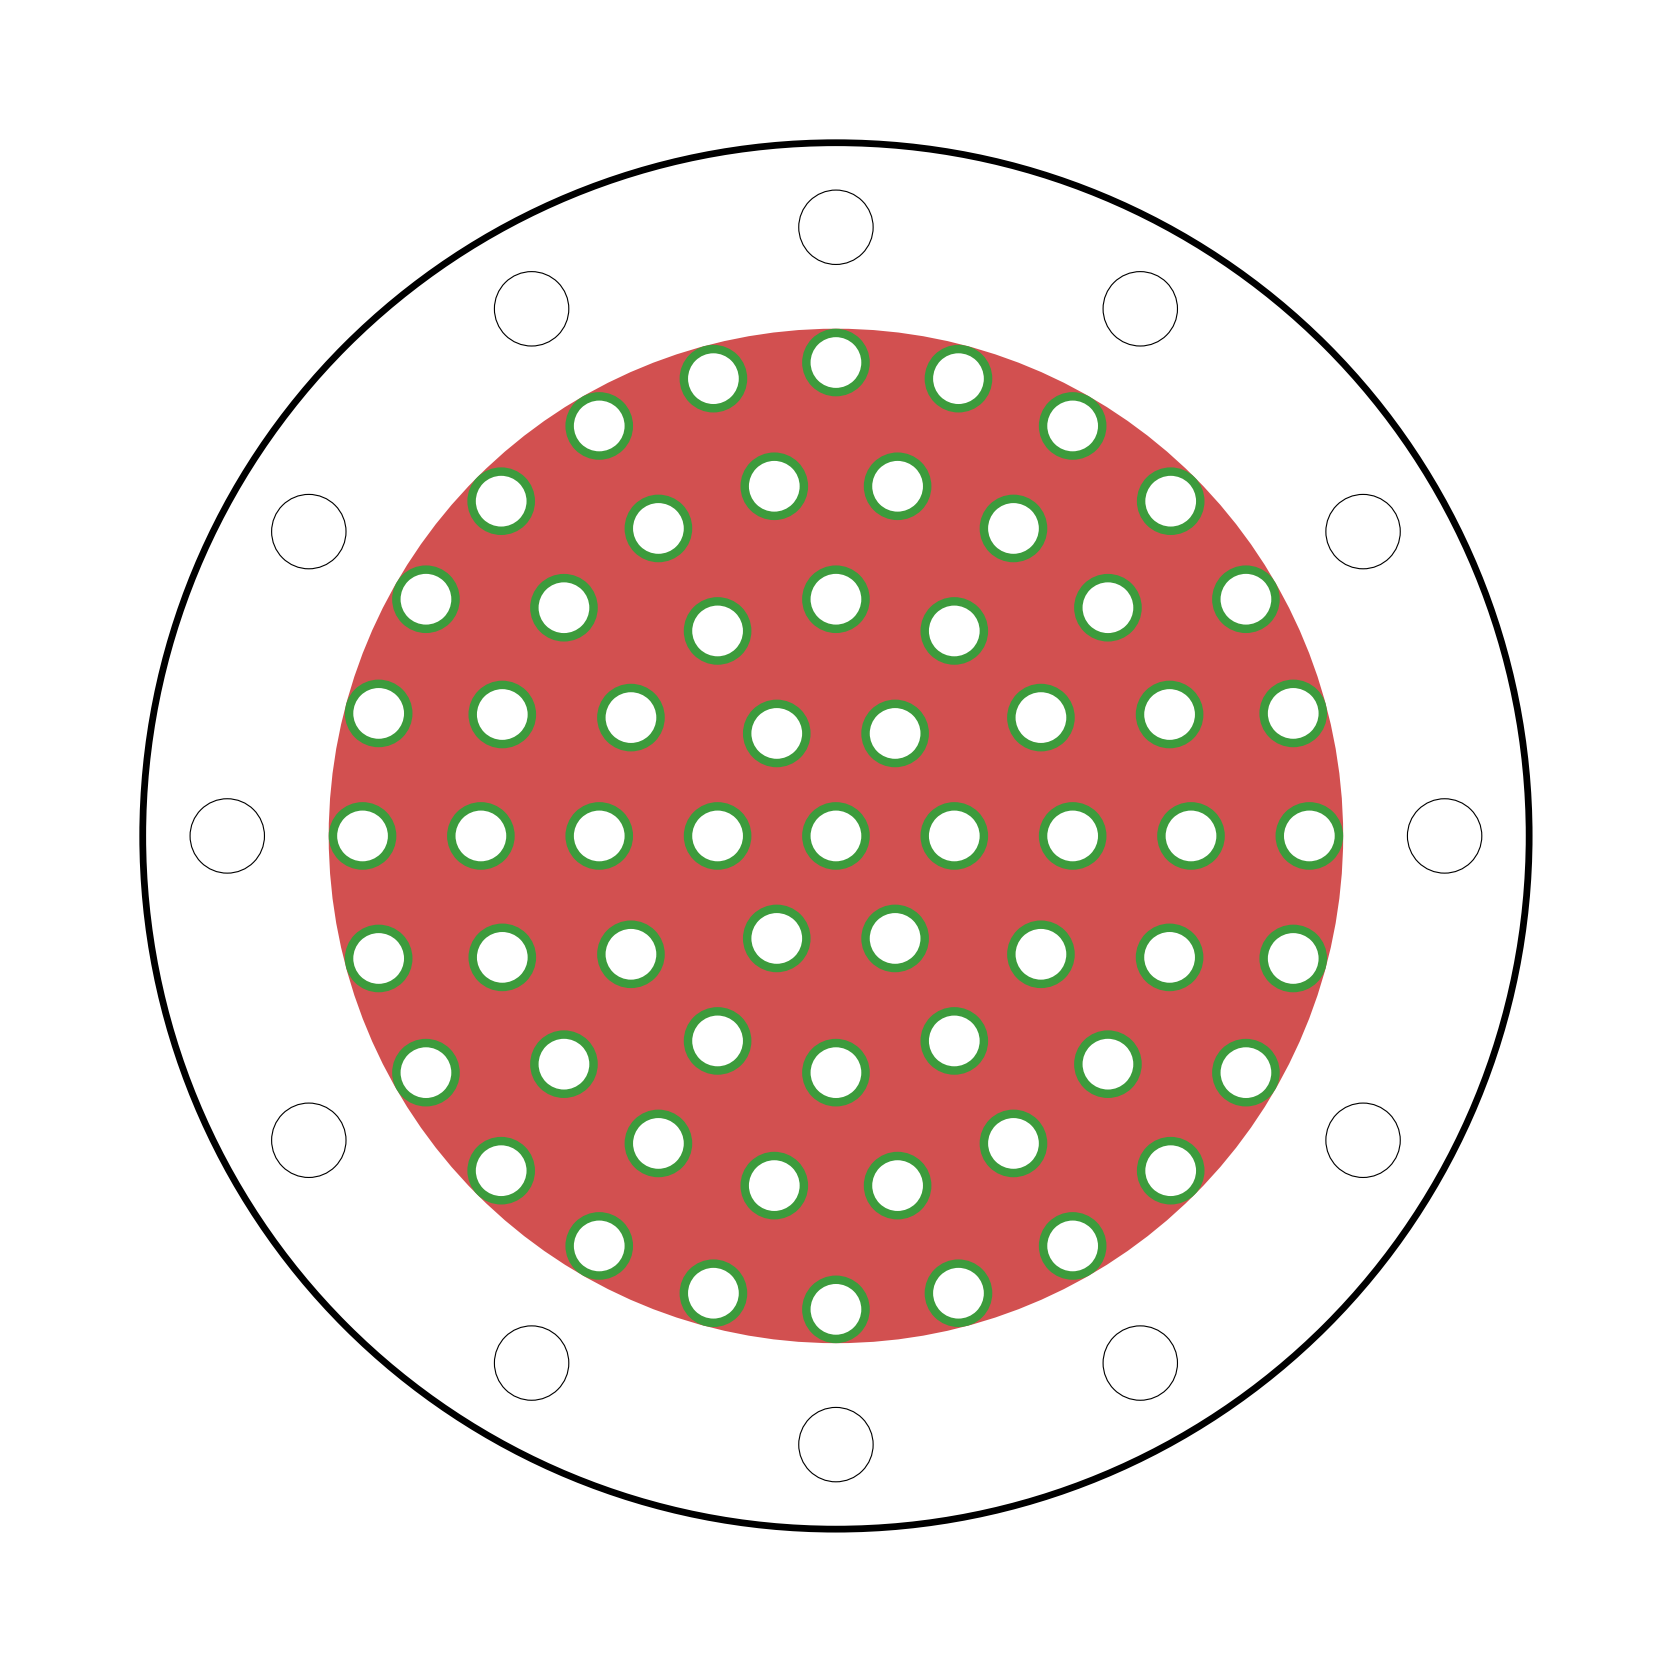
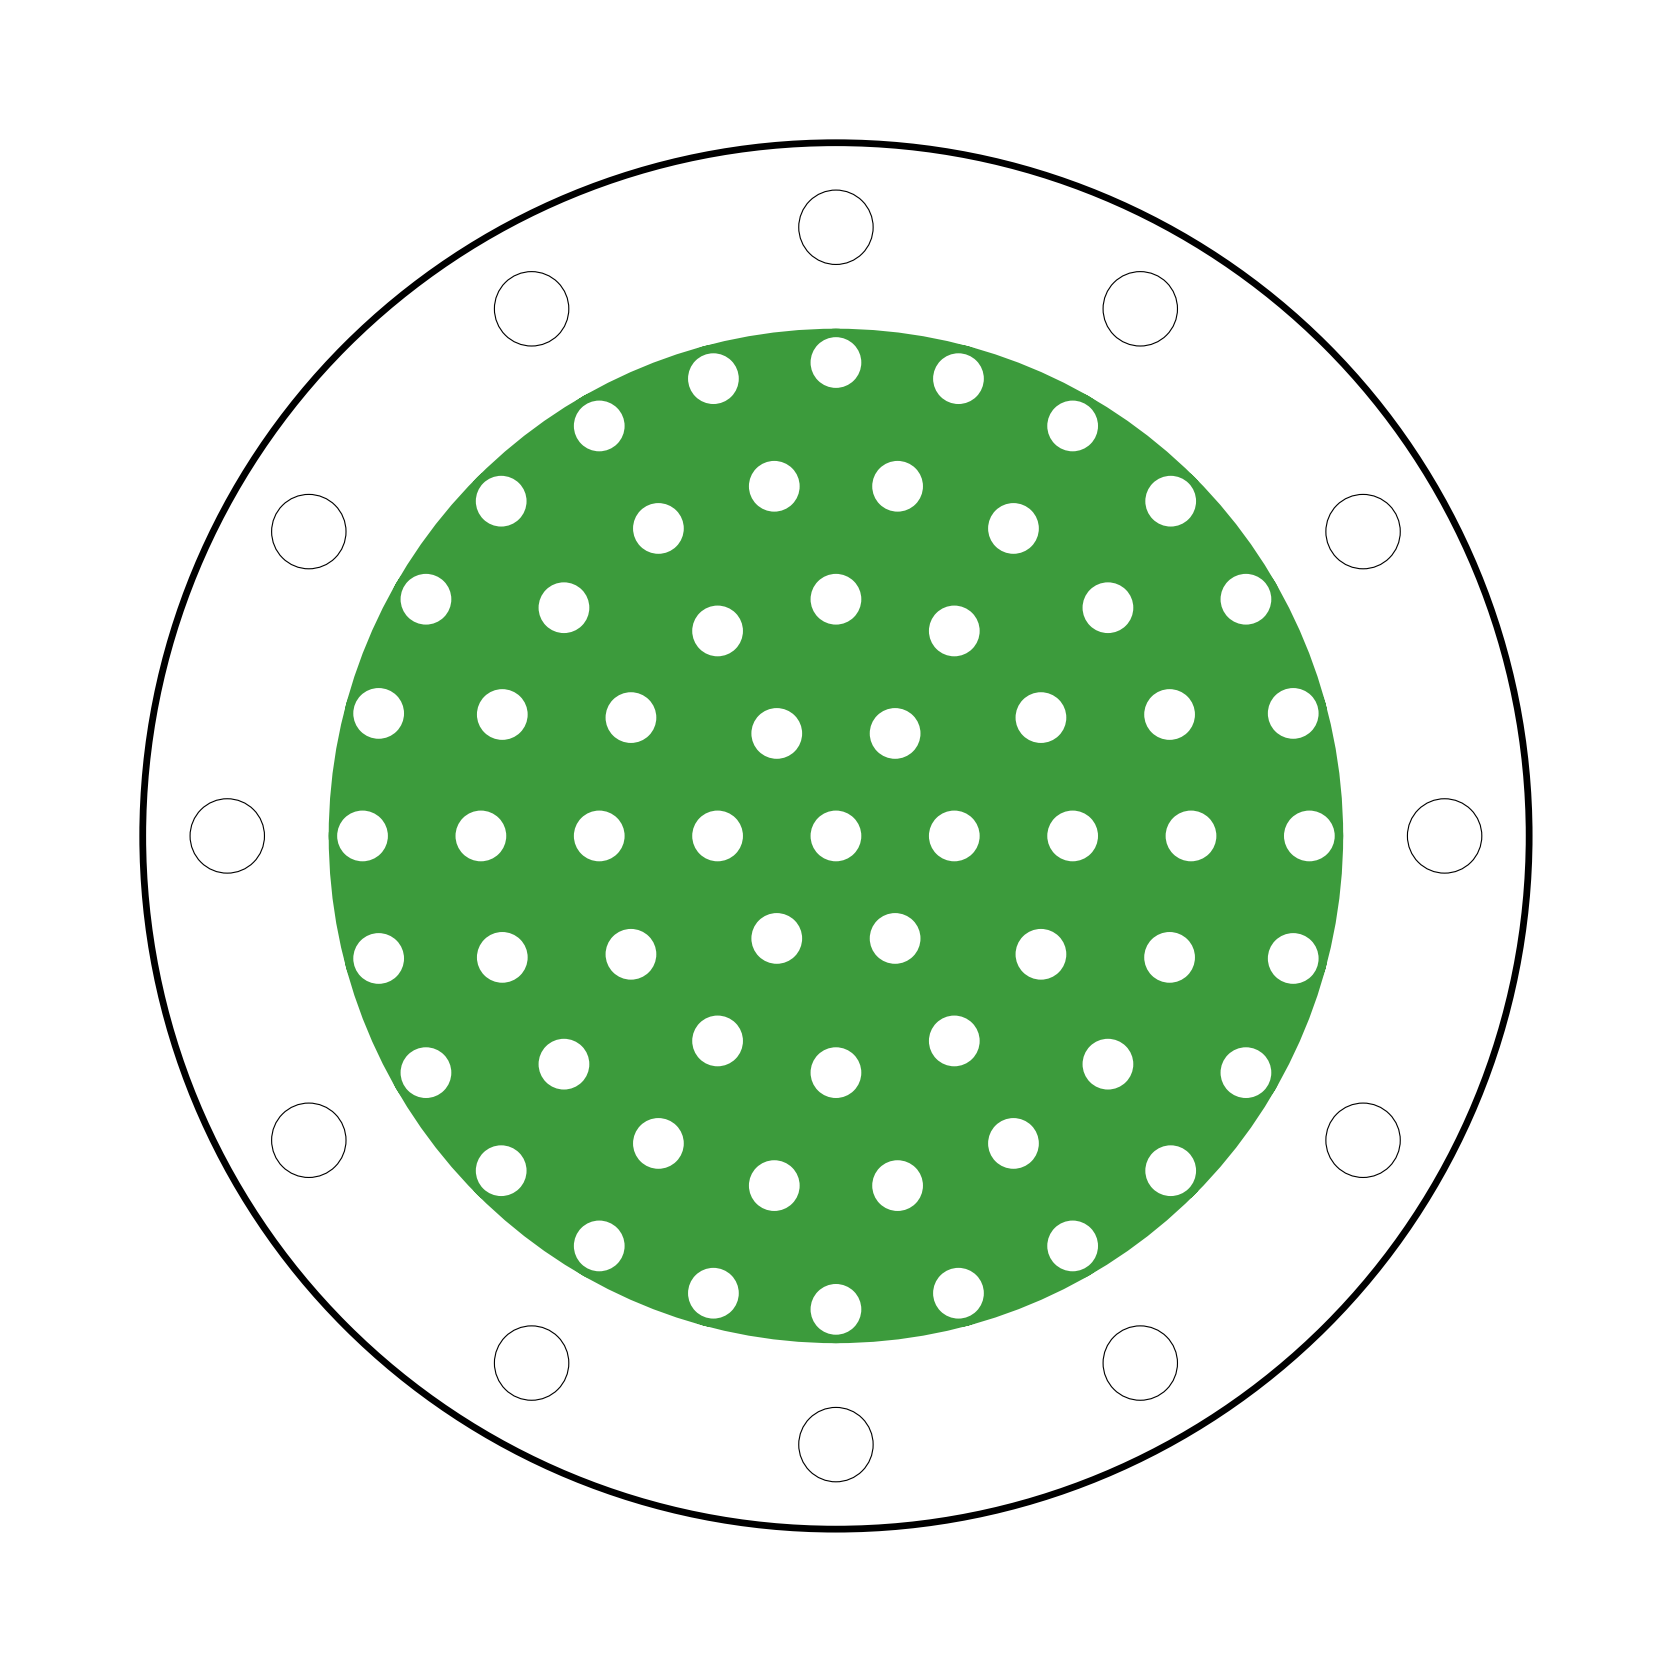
part footprint: [190, 190, 1482, 1482] -> [190, 190, 1482, 1482]

